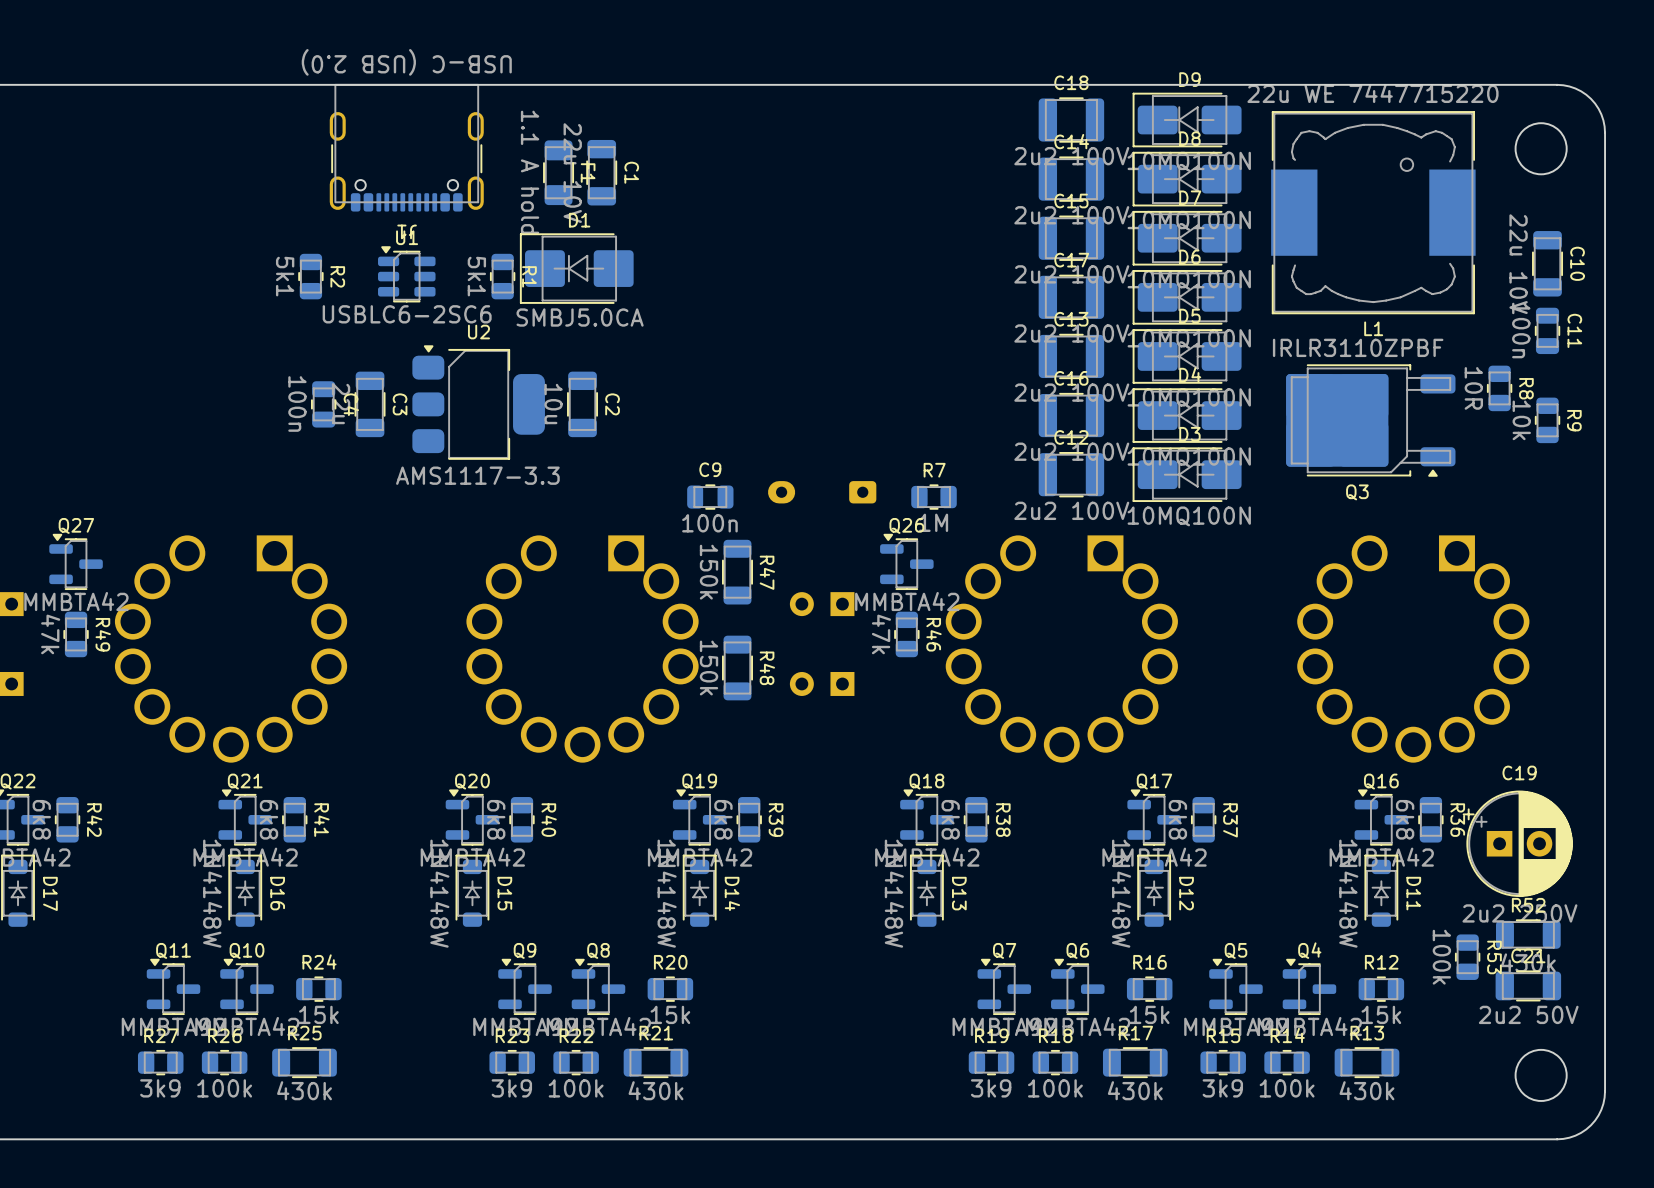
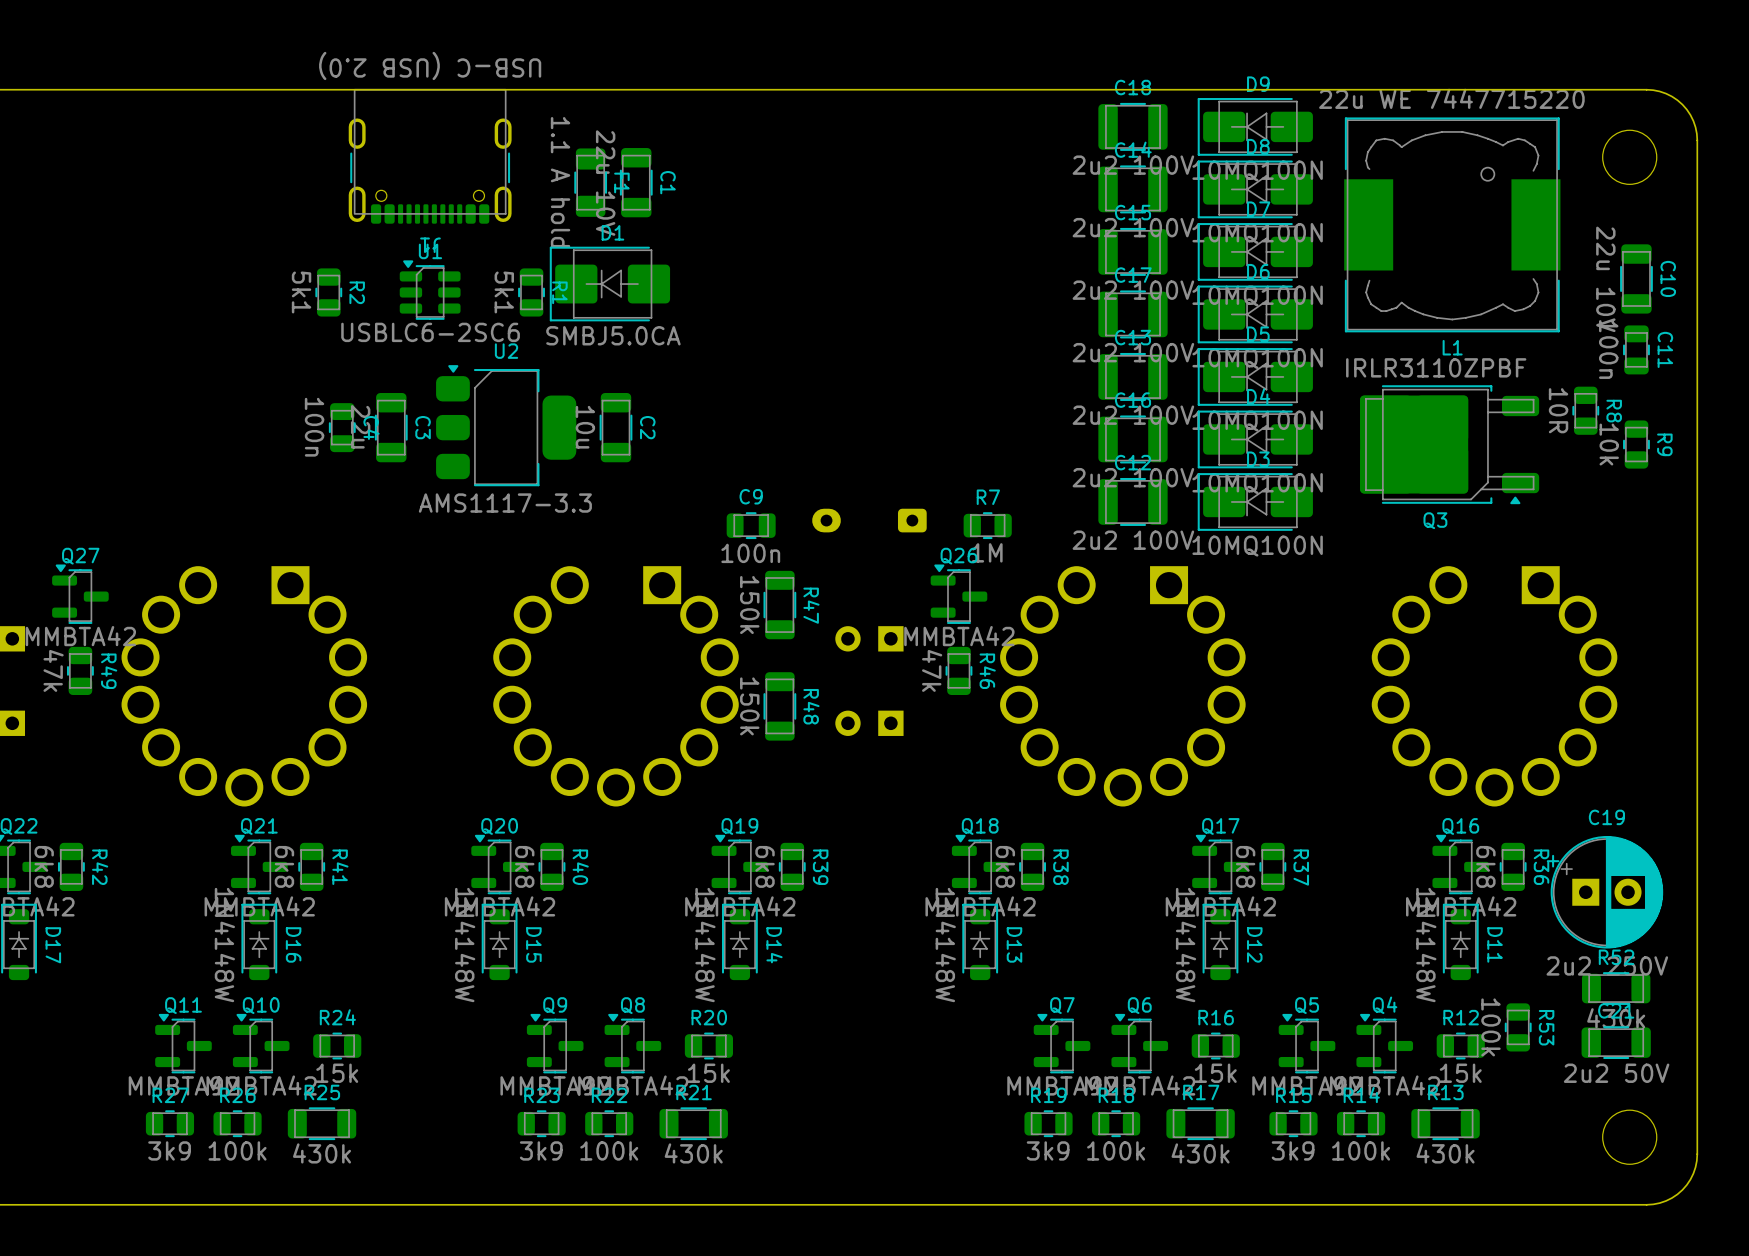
R53 position: (1467, 957) -> (1518, 1027)

